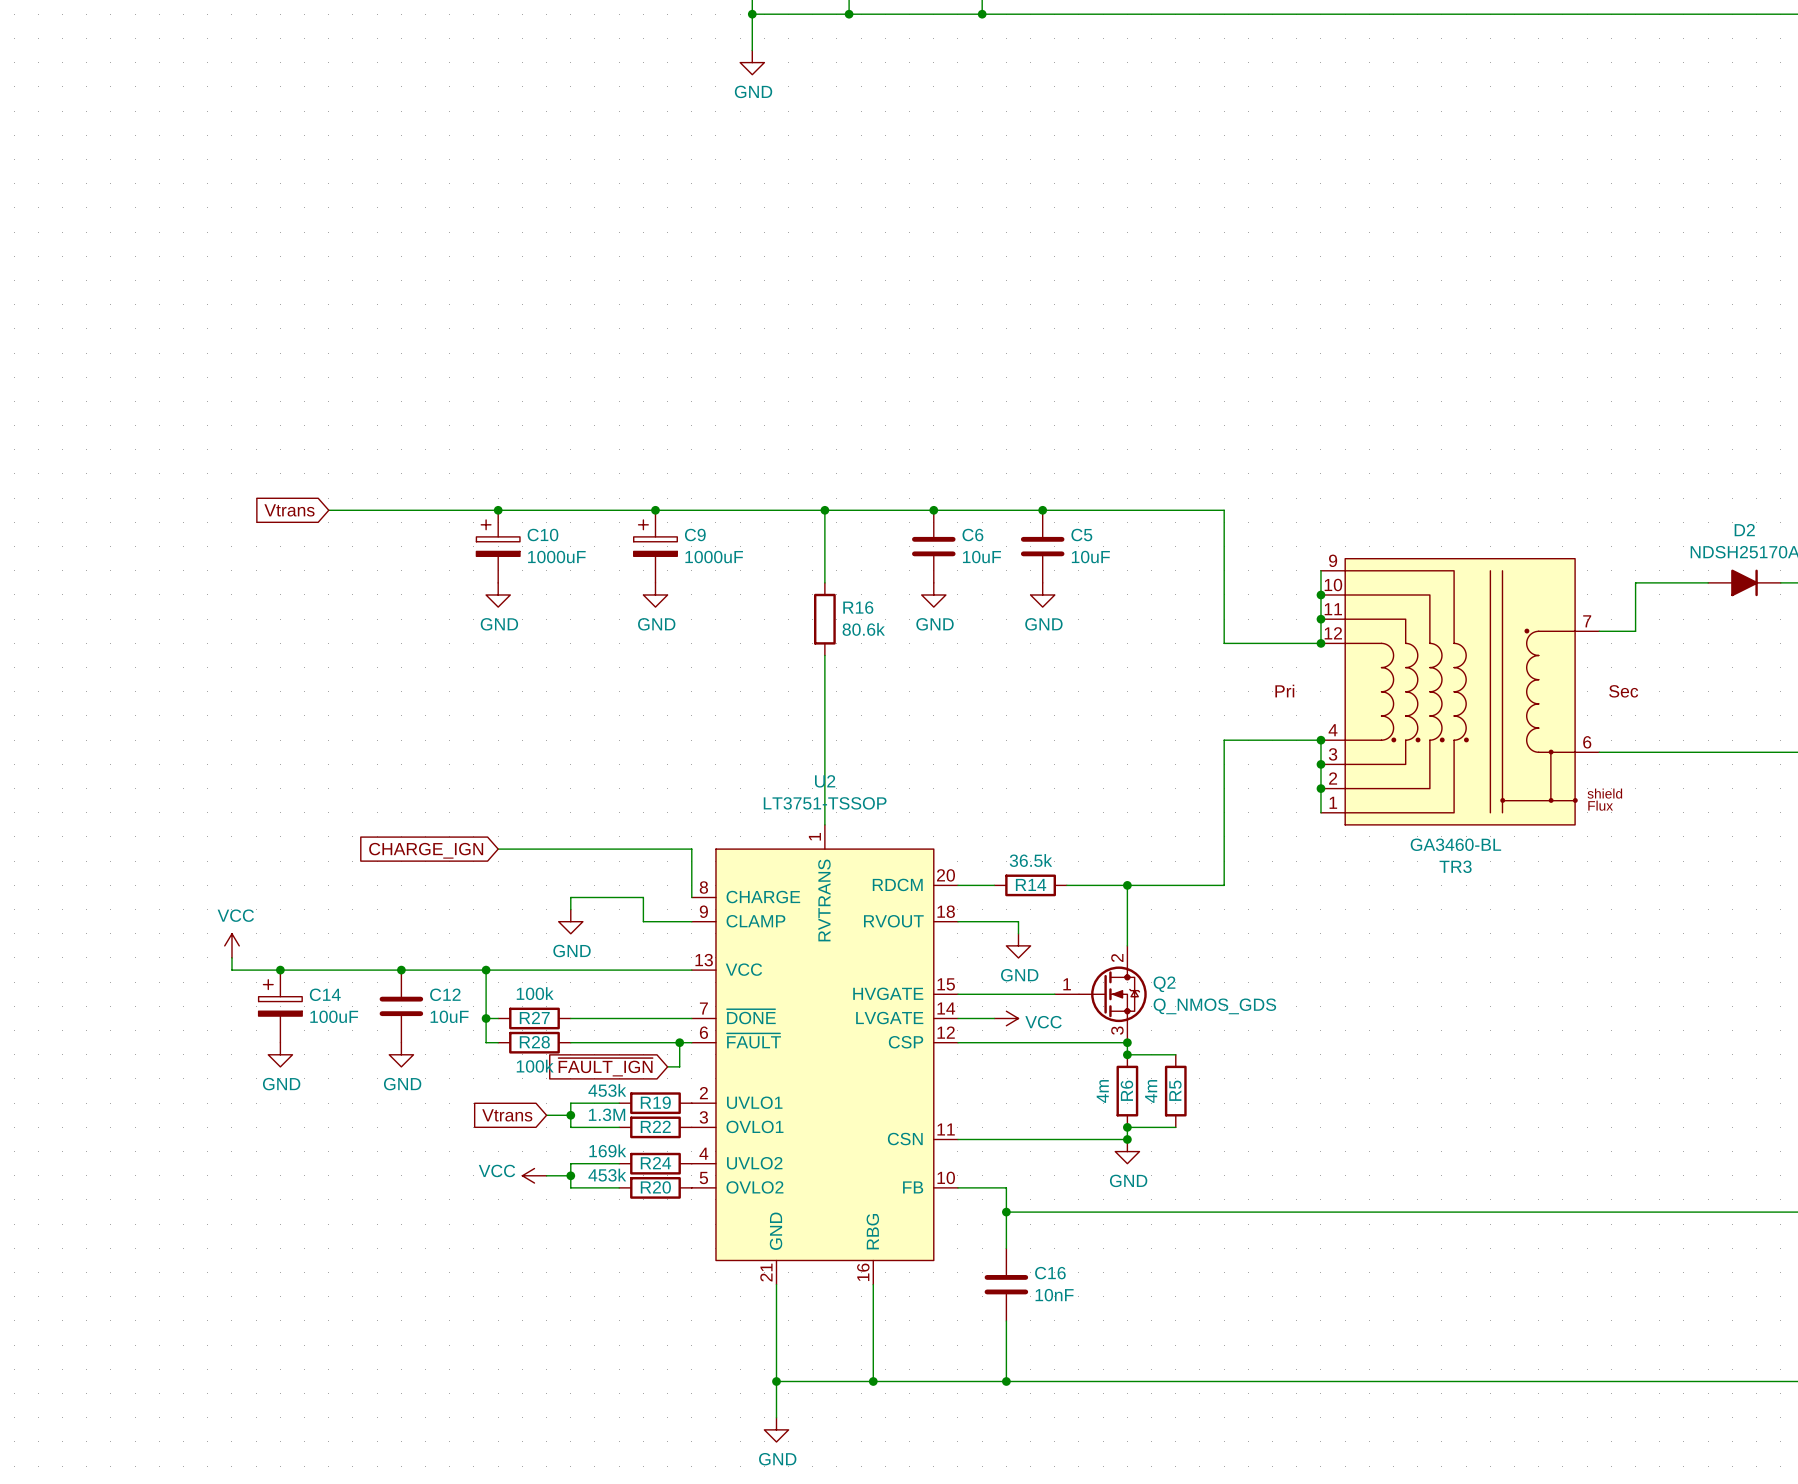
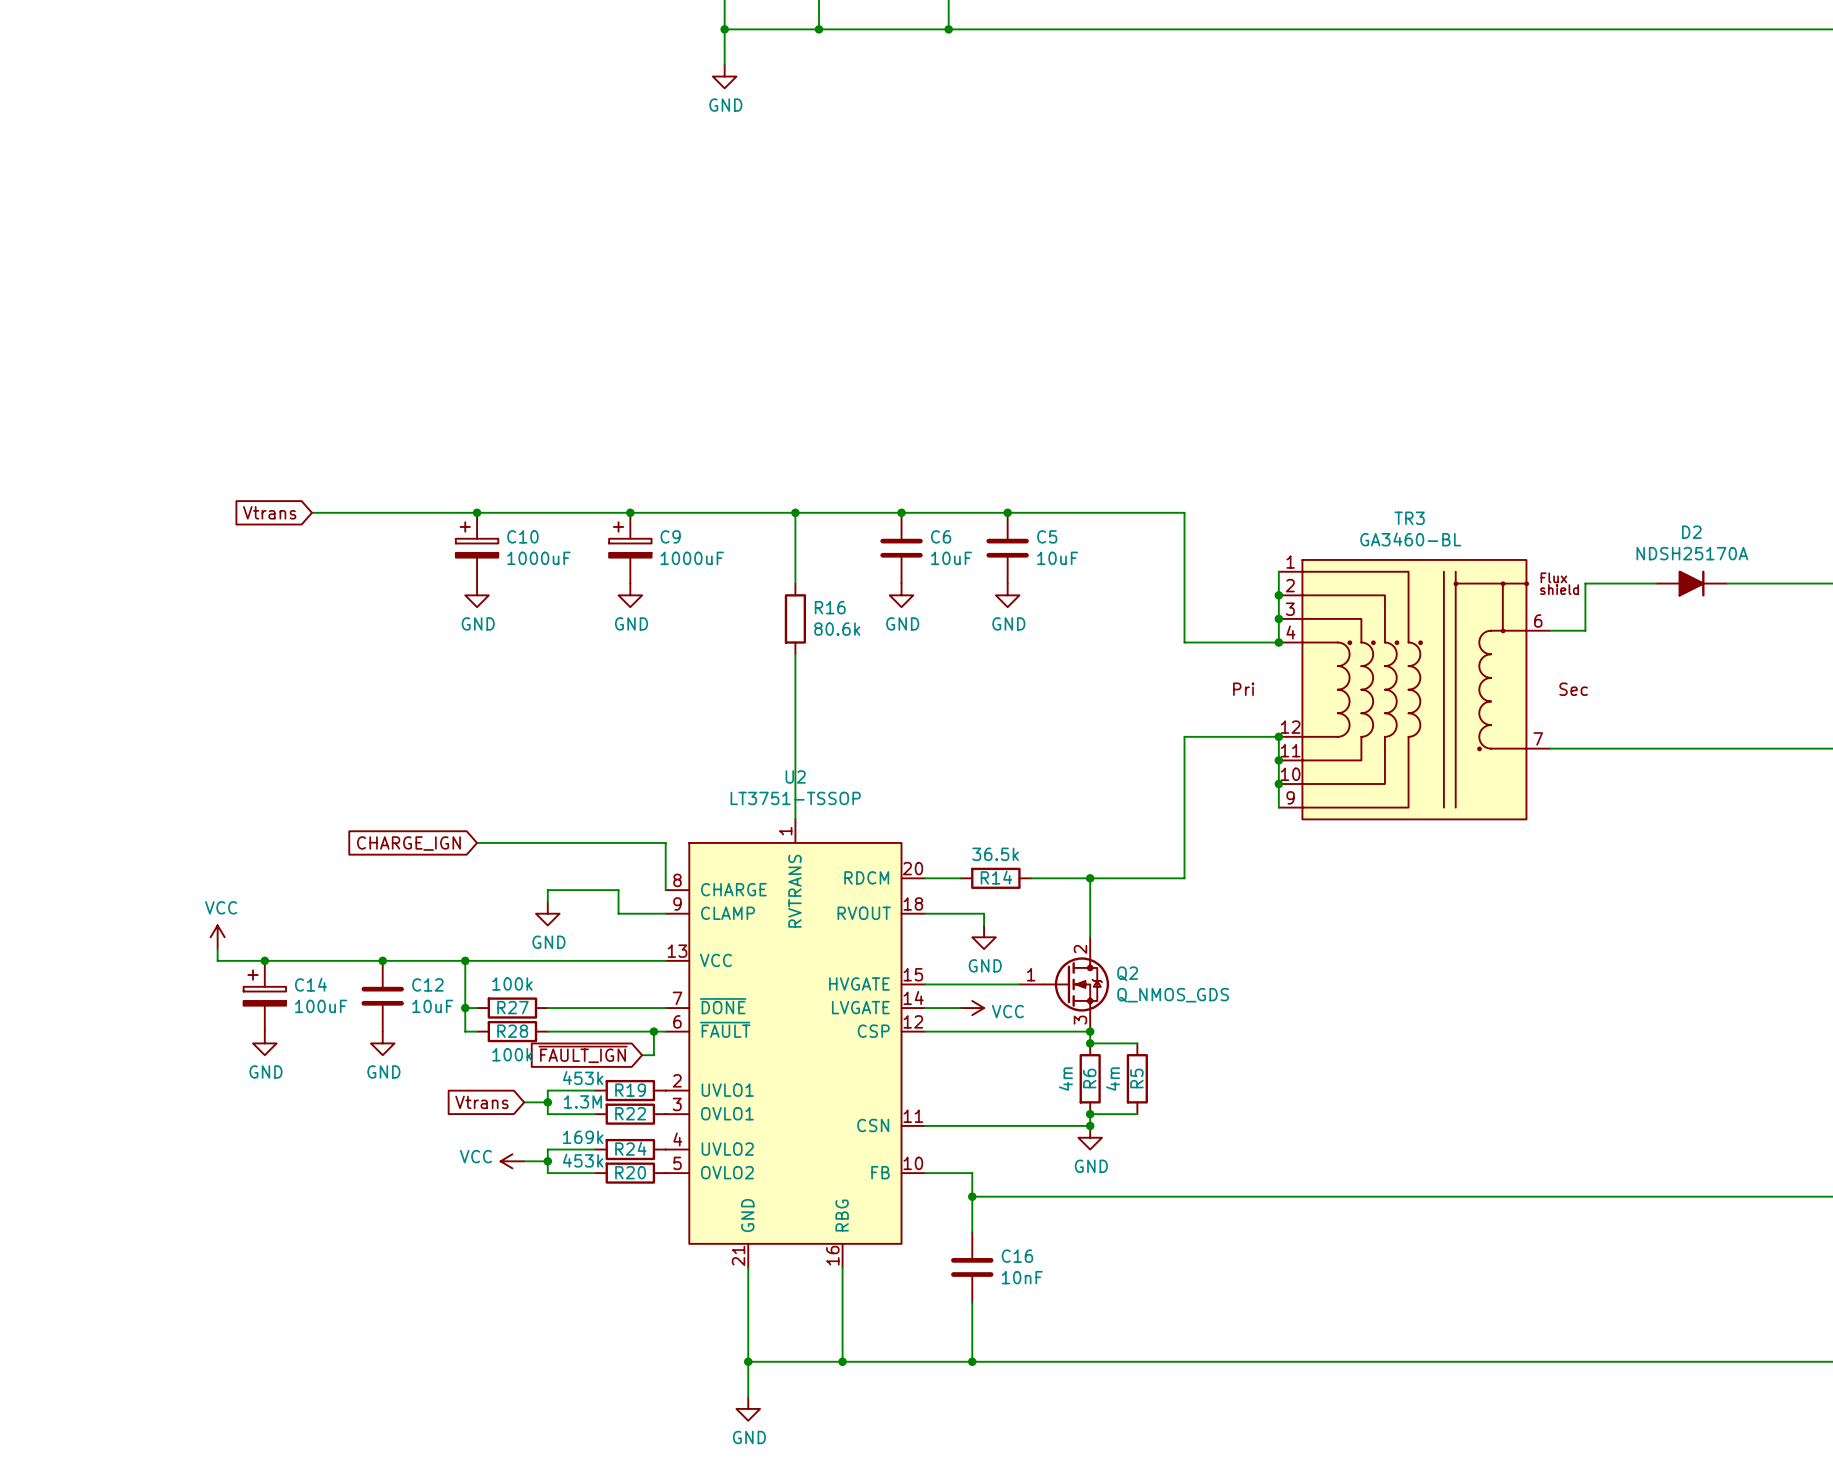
TR3 flip: as is (1461, 691) -> up-down (1415, 689)

